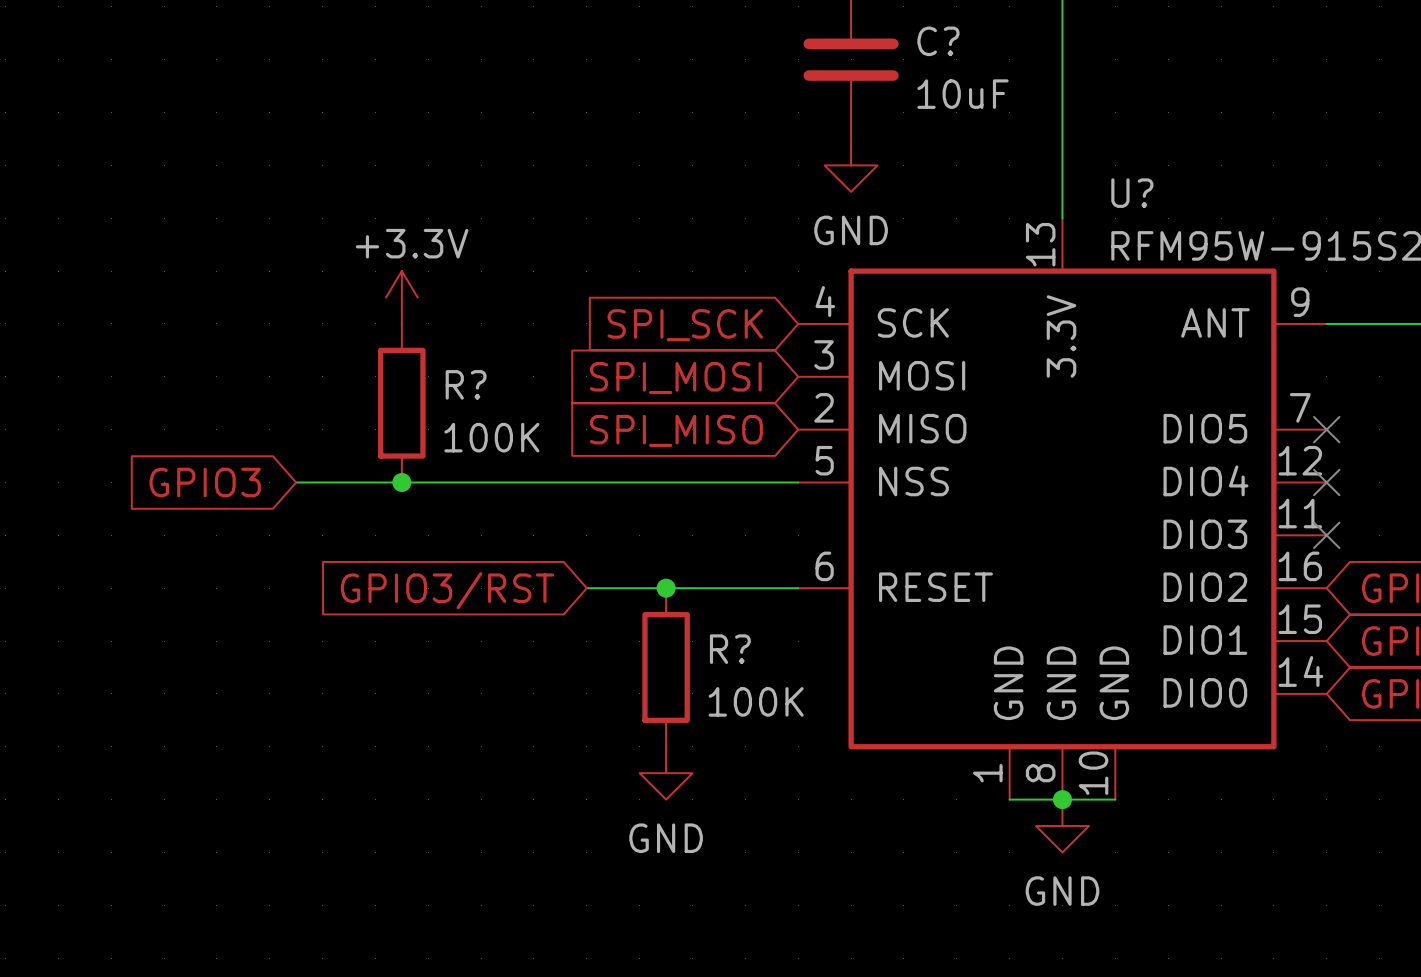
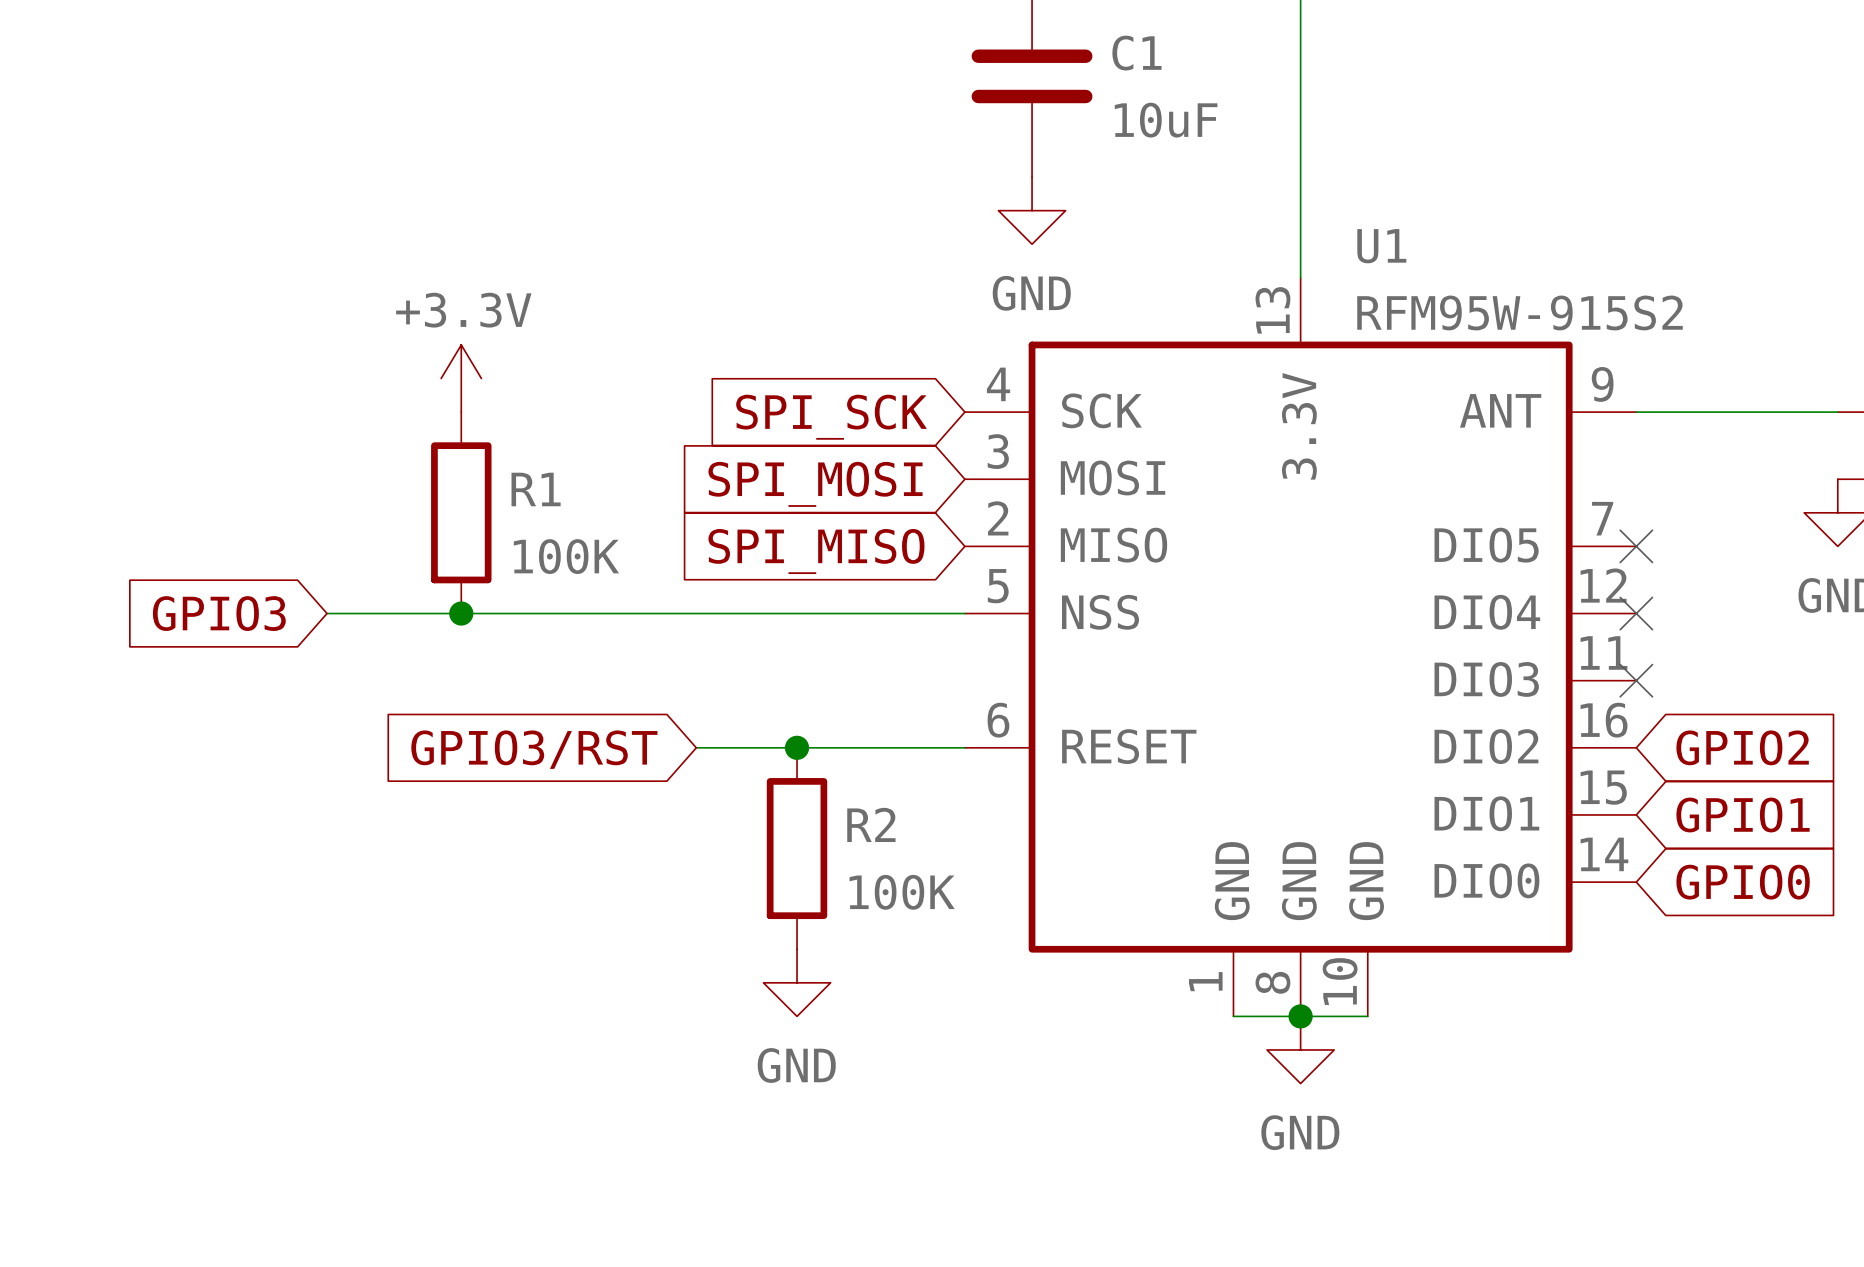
C? name: C? (938, 41) -> C1 (1136, 53)
U? name: U? (1132, 193) -> U1 (1381, 246)
R? name: R? (466, 384) -> R1 (536, 489)
R? name: R? (730, 649) -> R2 (871, 824)

